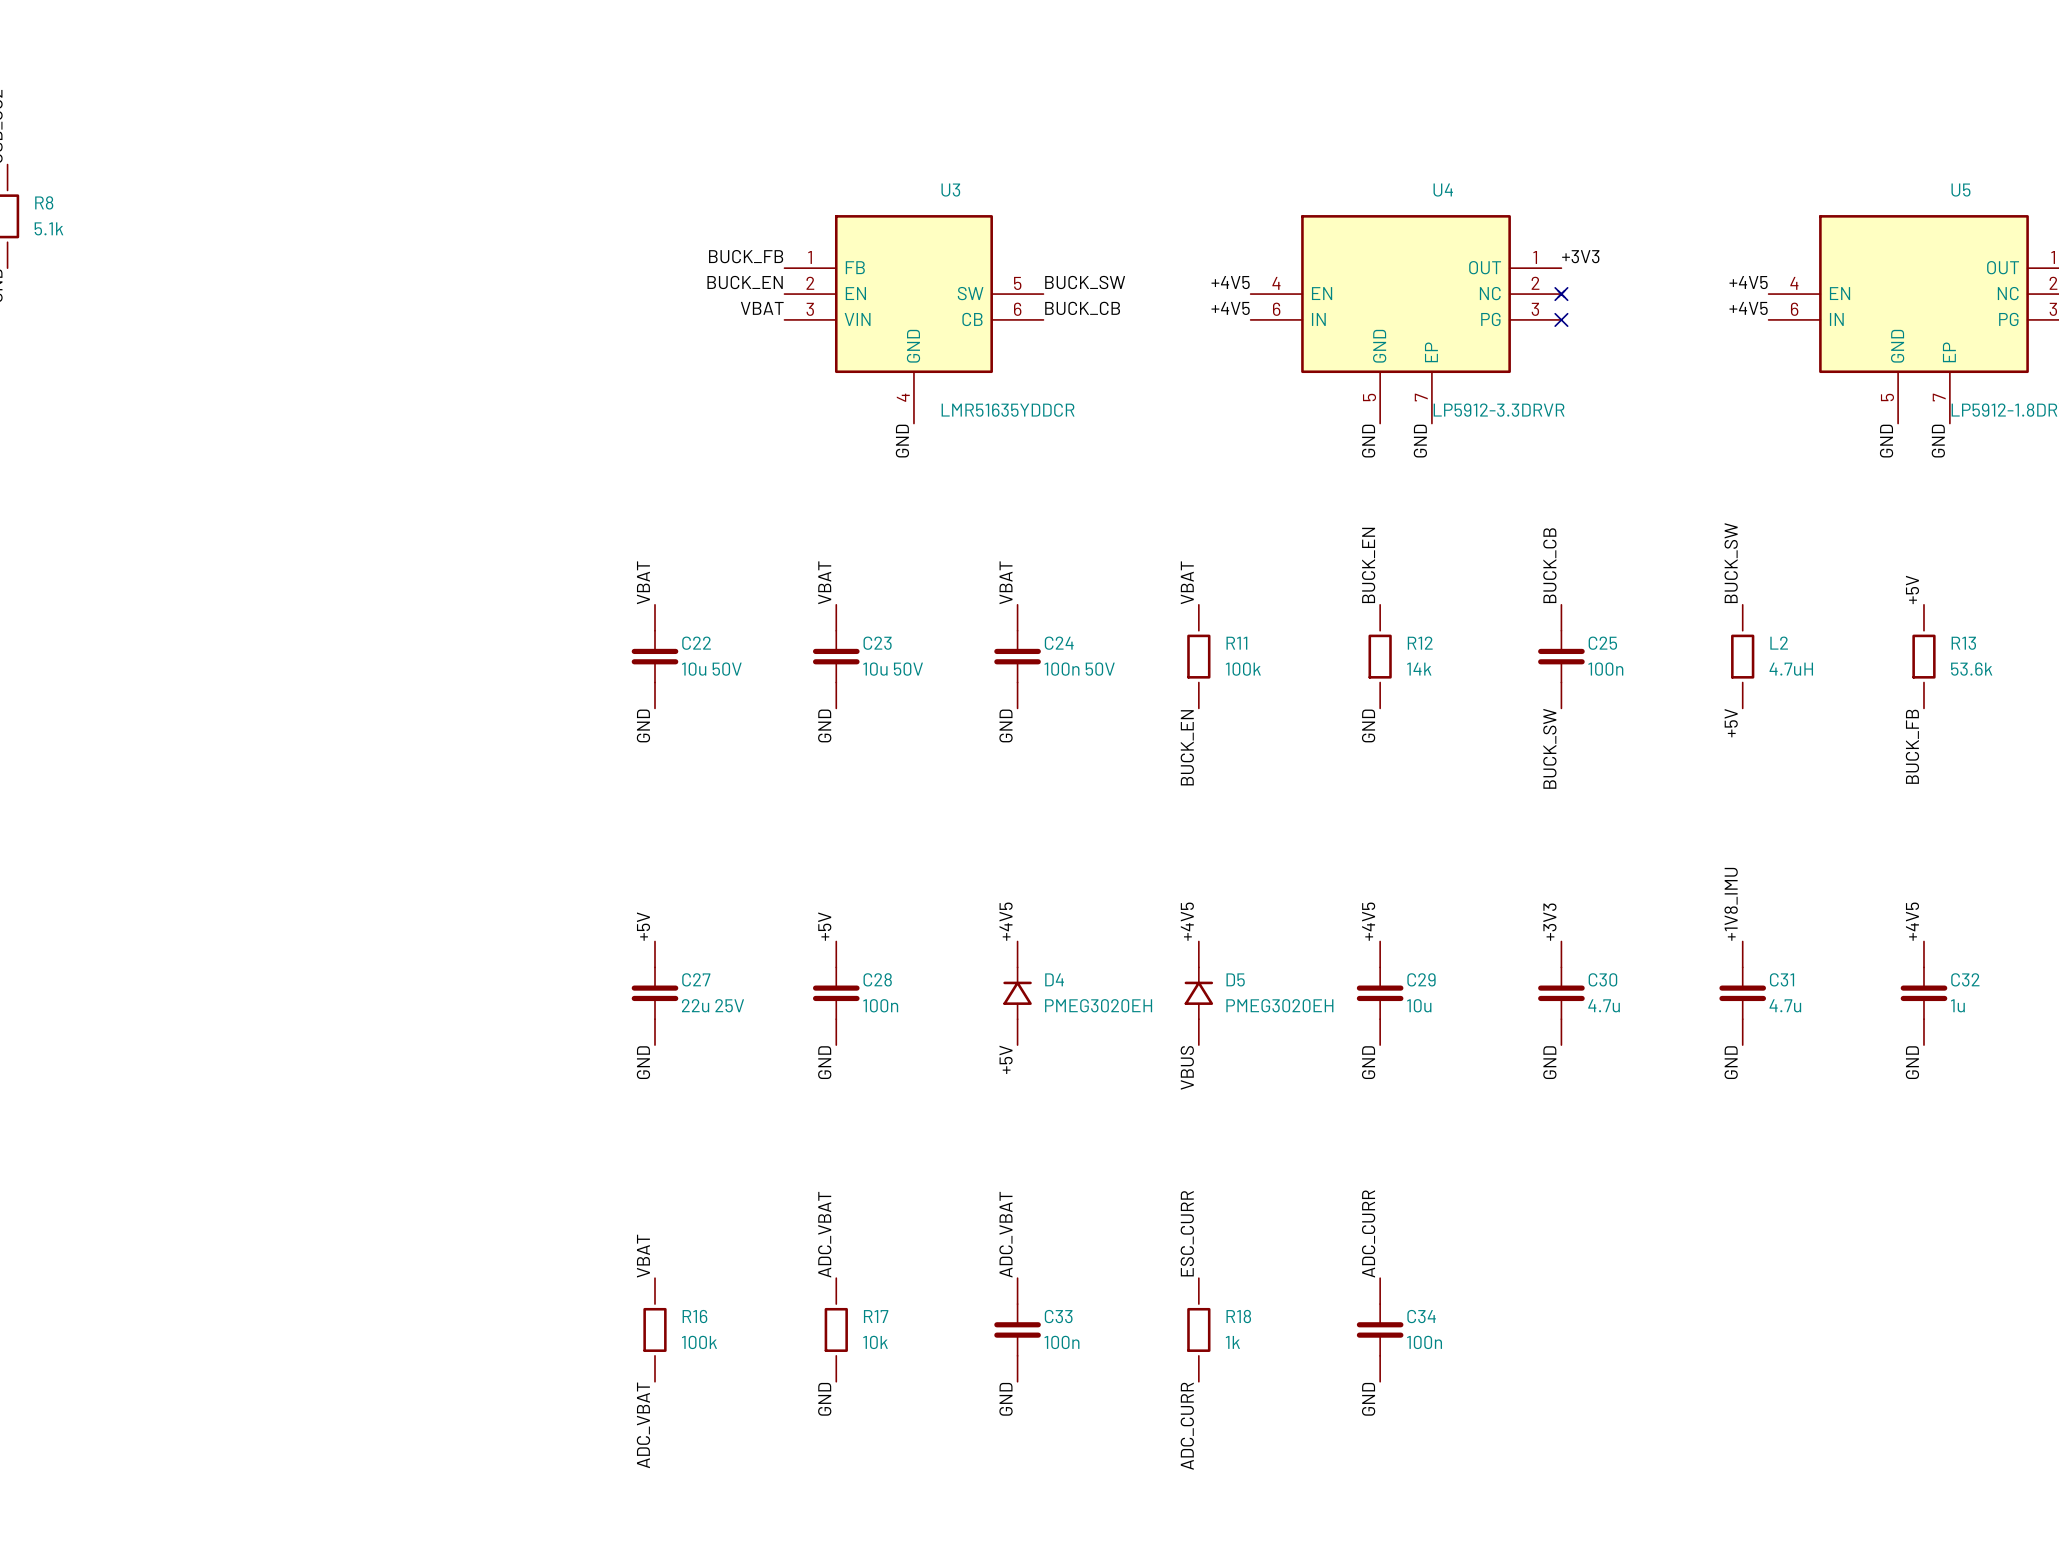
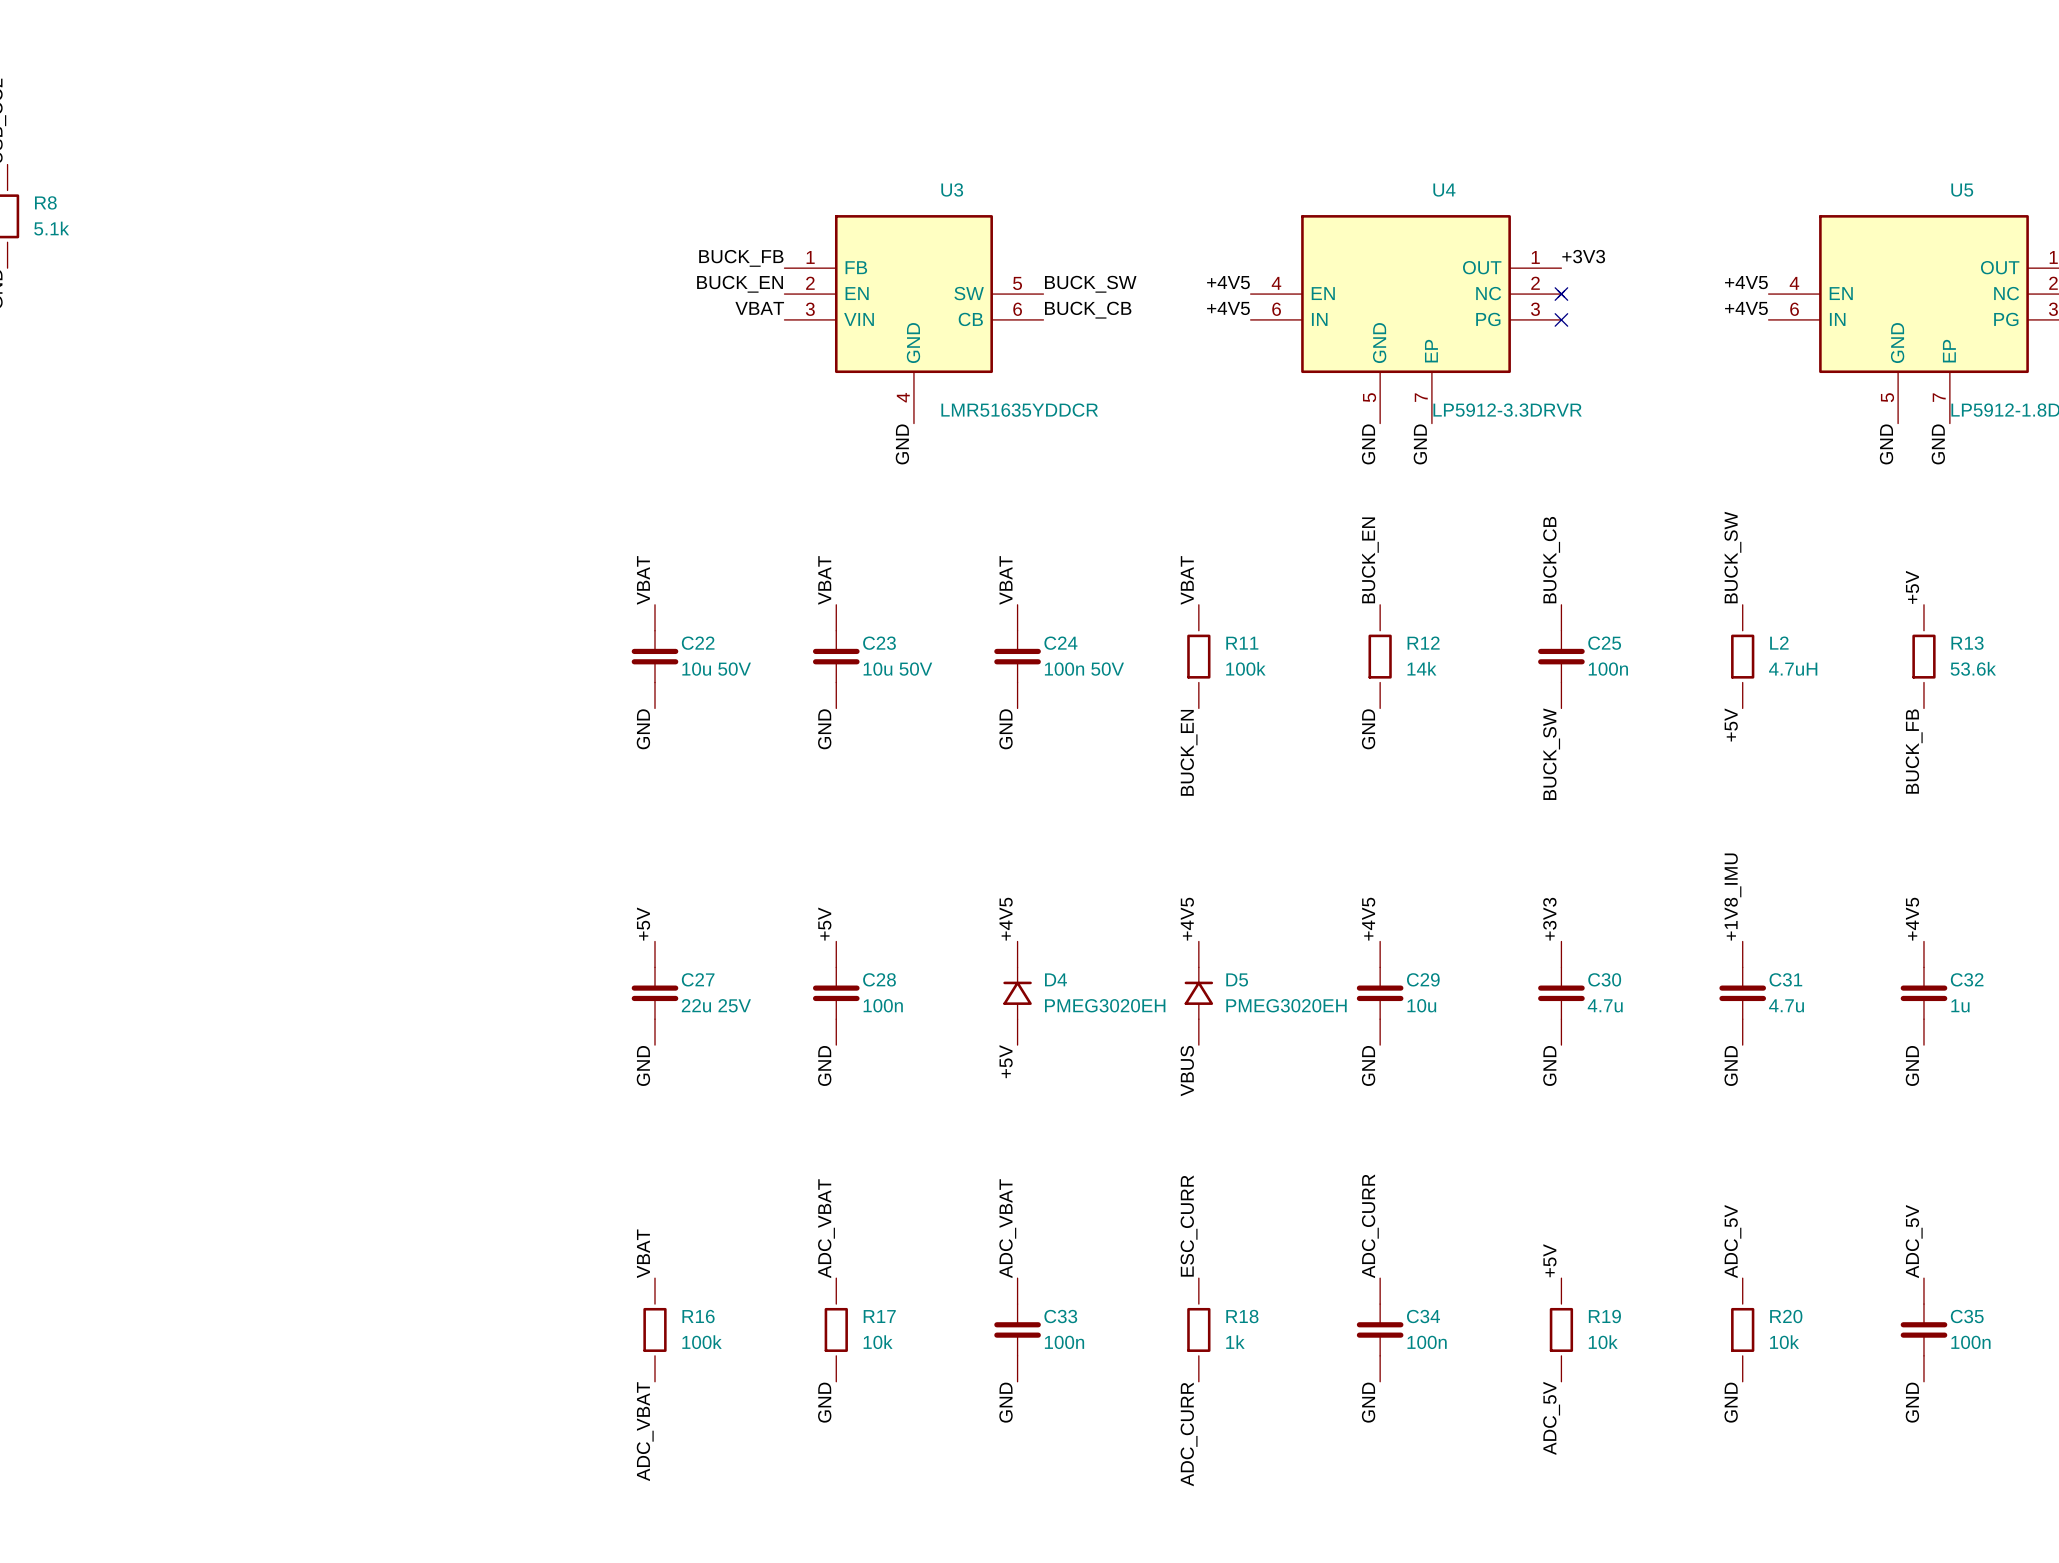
label: none -> ADC_5V (1732, 1241)
label: none -> ADC_5V (1914, 1241)
label: none -> +5V (1549, 1260)
R19: none -> 10k (1561, 1329)
R20: none -> 10k (1742, 1329)
C35: none -> 100n (1923, 1329)
label: none -> GND (1731, 1402)
label: none -> GND (1912, 1402)
label: none -> ADC_5V (1551, 1418)

